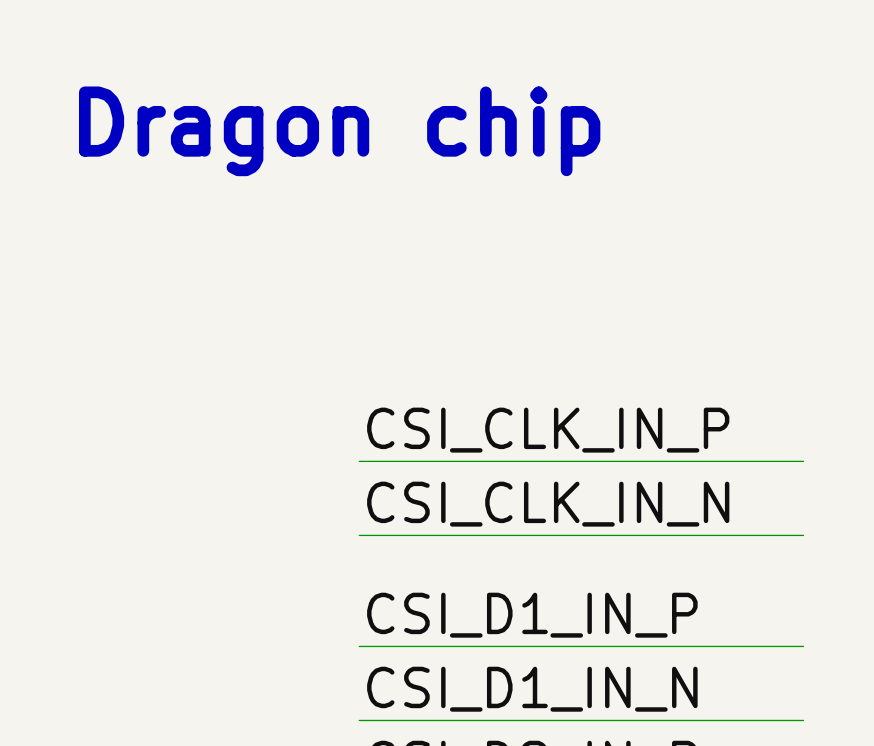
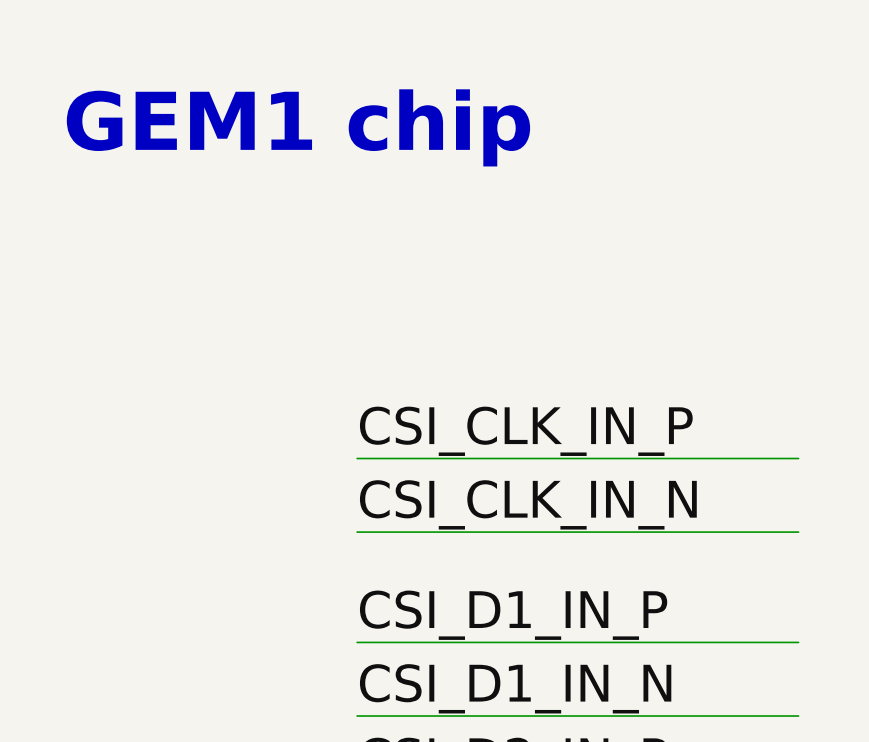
text: Dragon chip (339, 131) -> GEM1 chip (298, 127)

